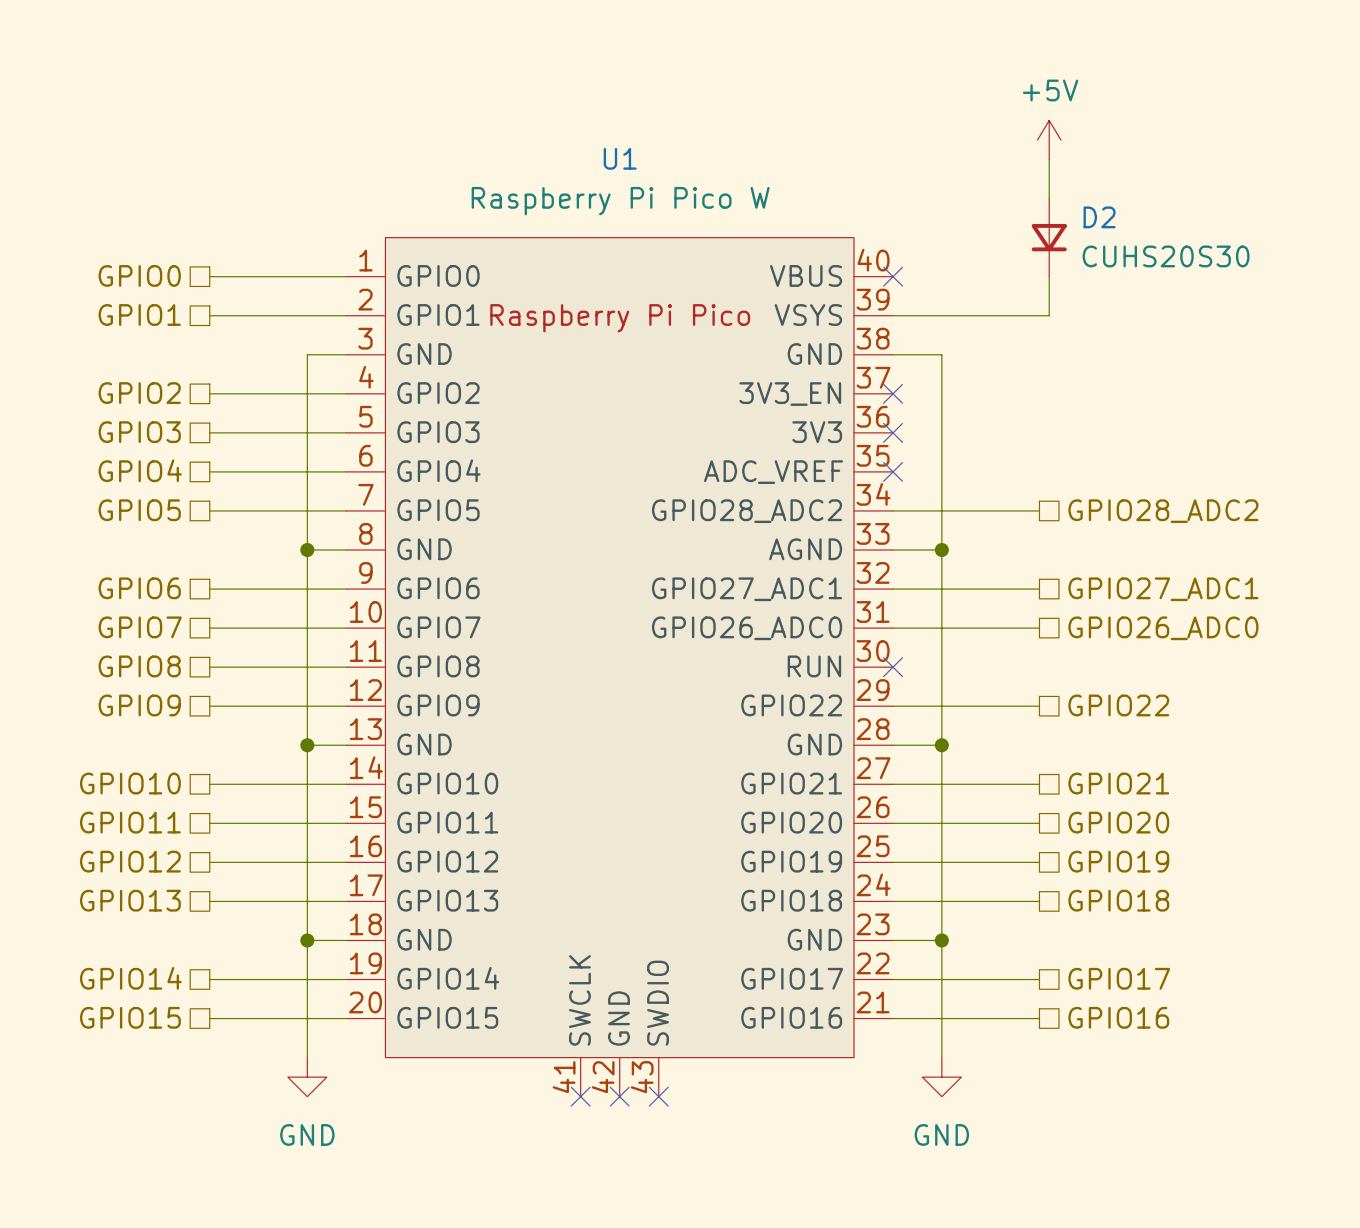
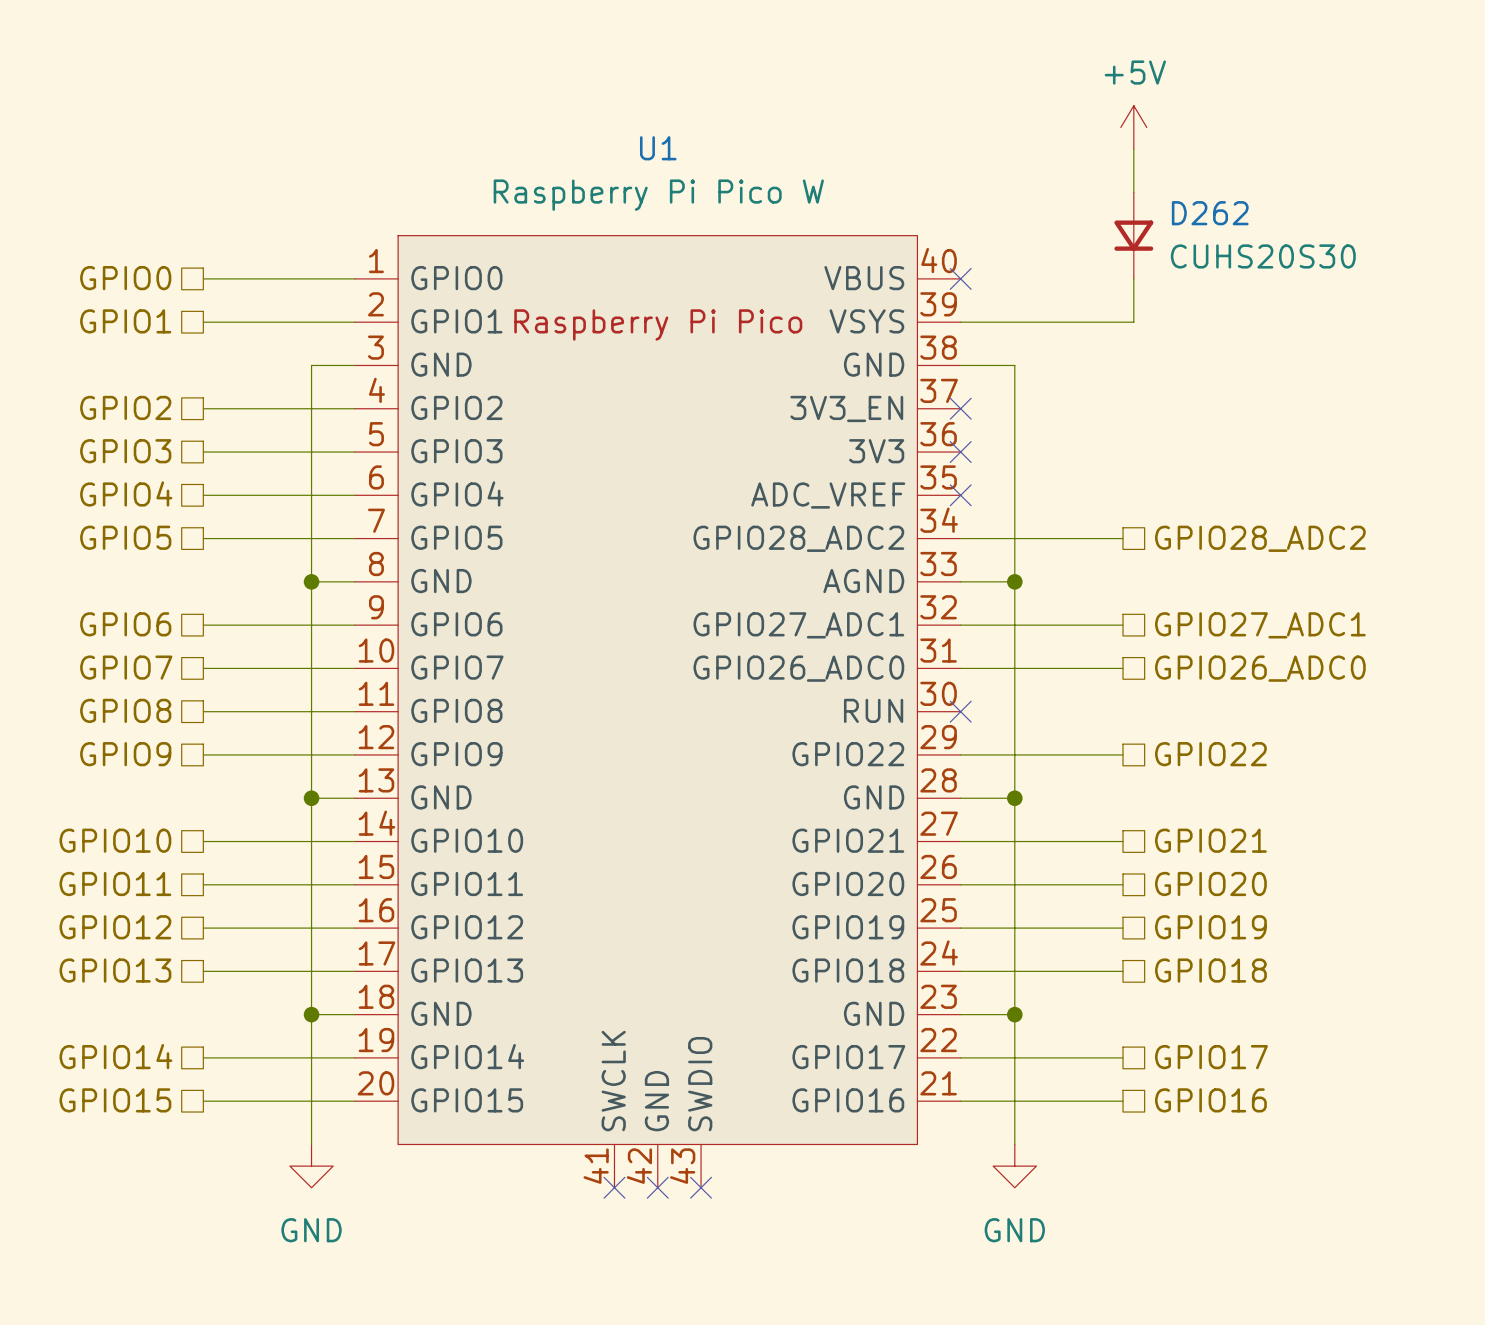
D2 name: D2 (1099, 217) -> D262 (1210, 213)

